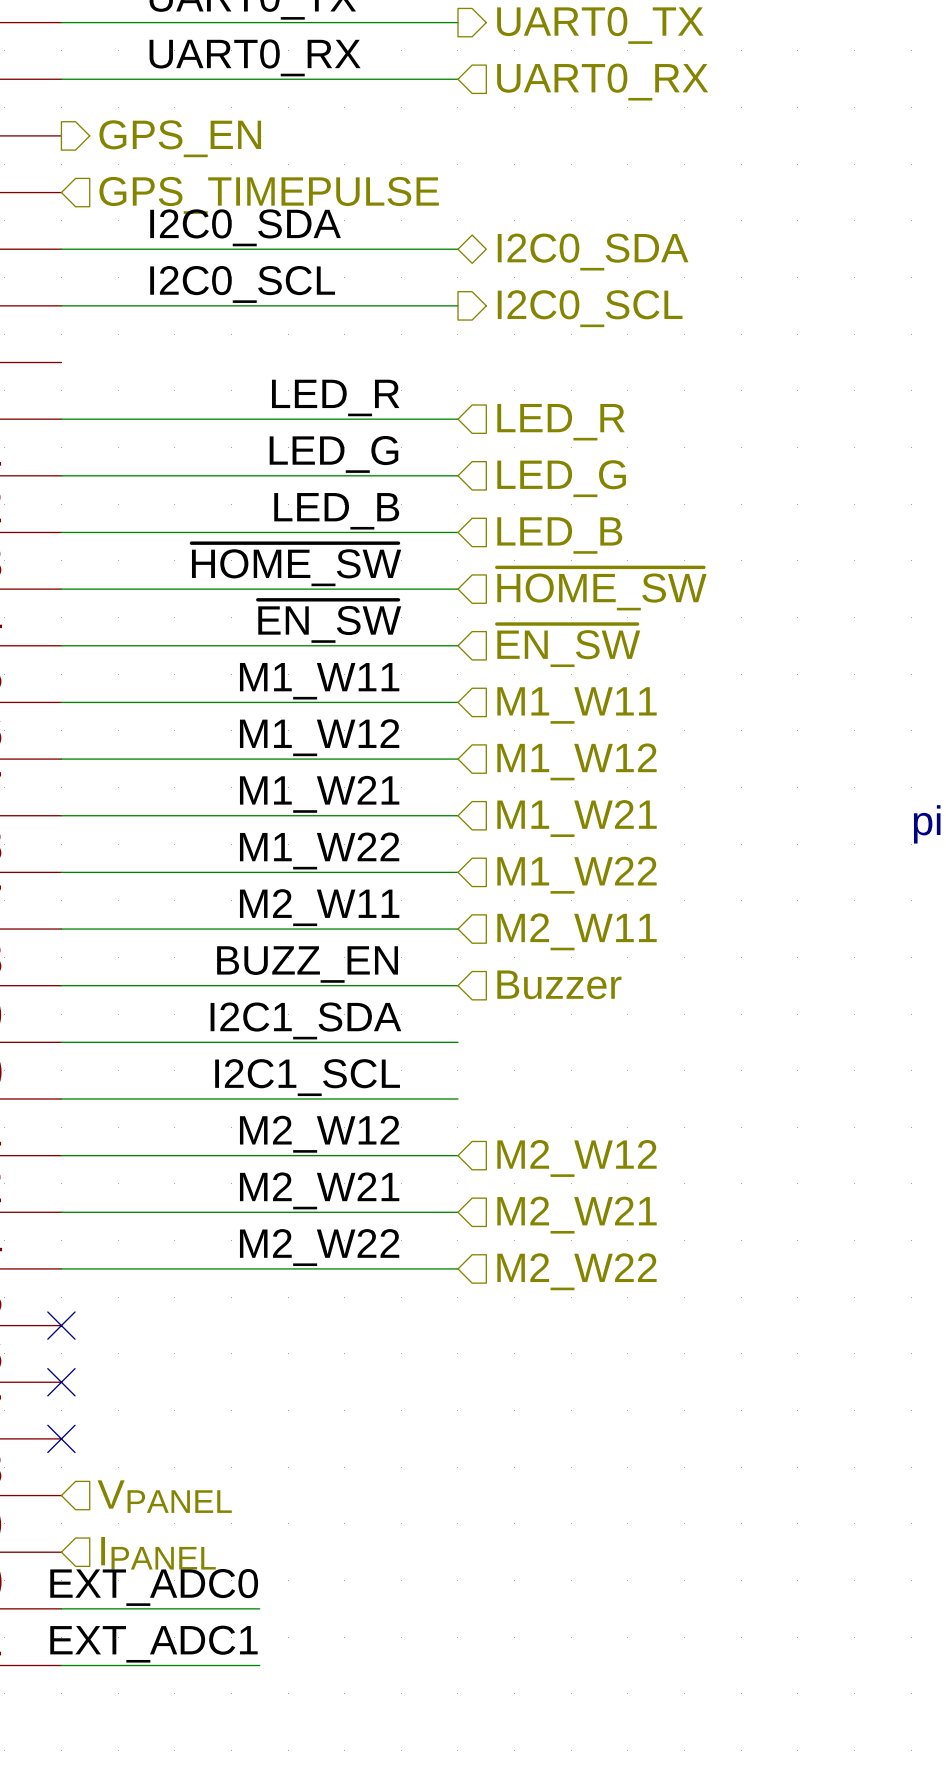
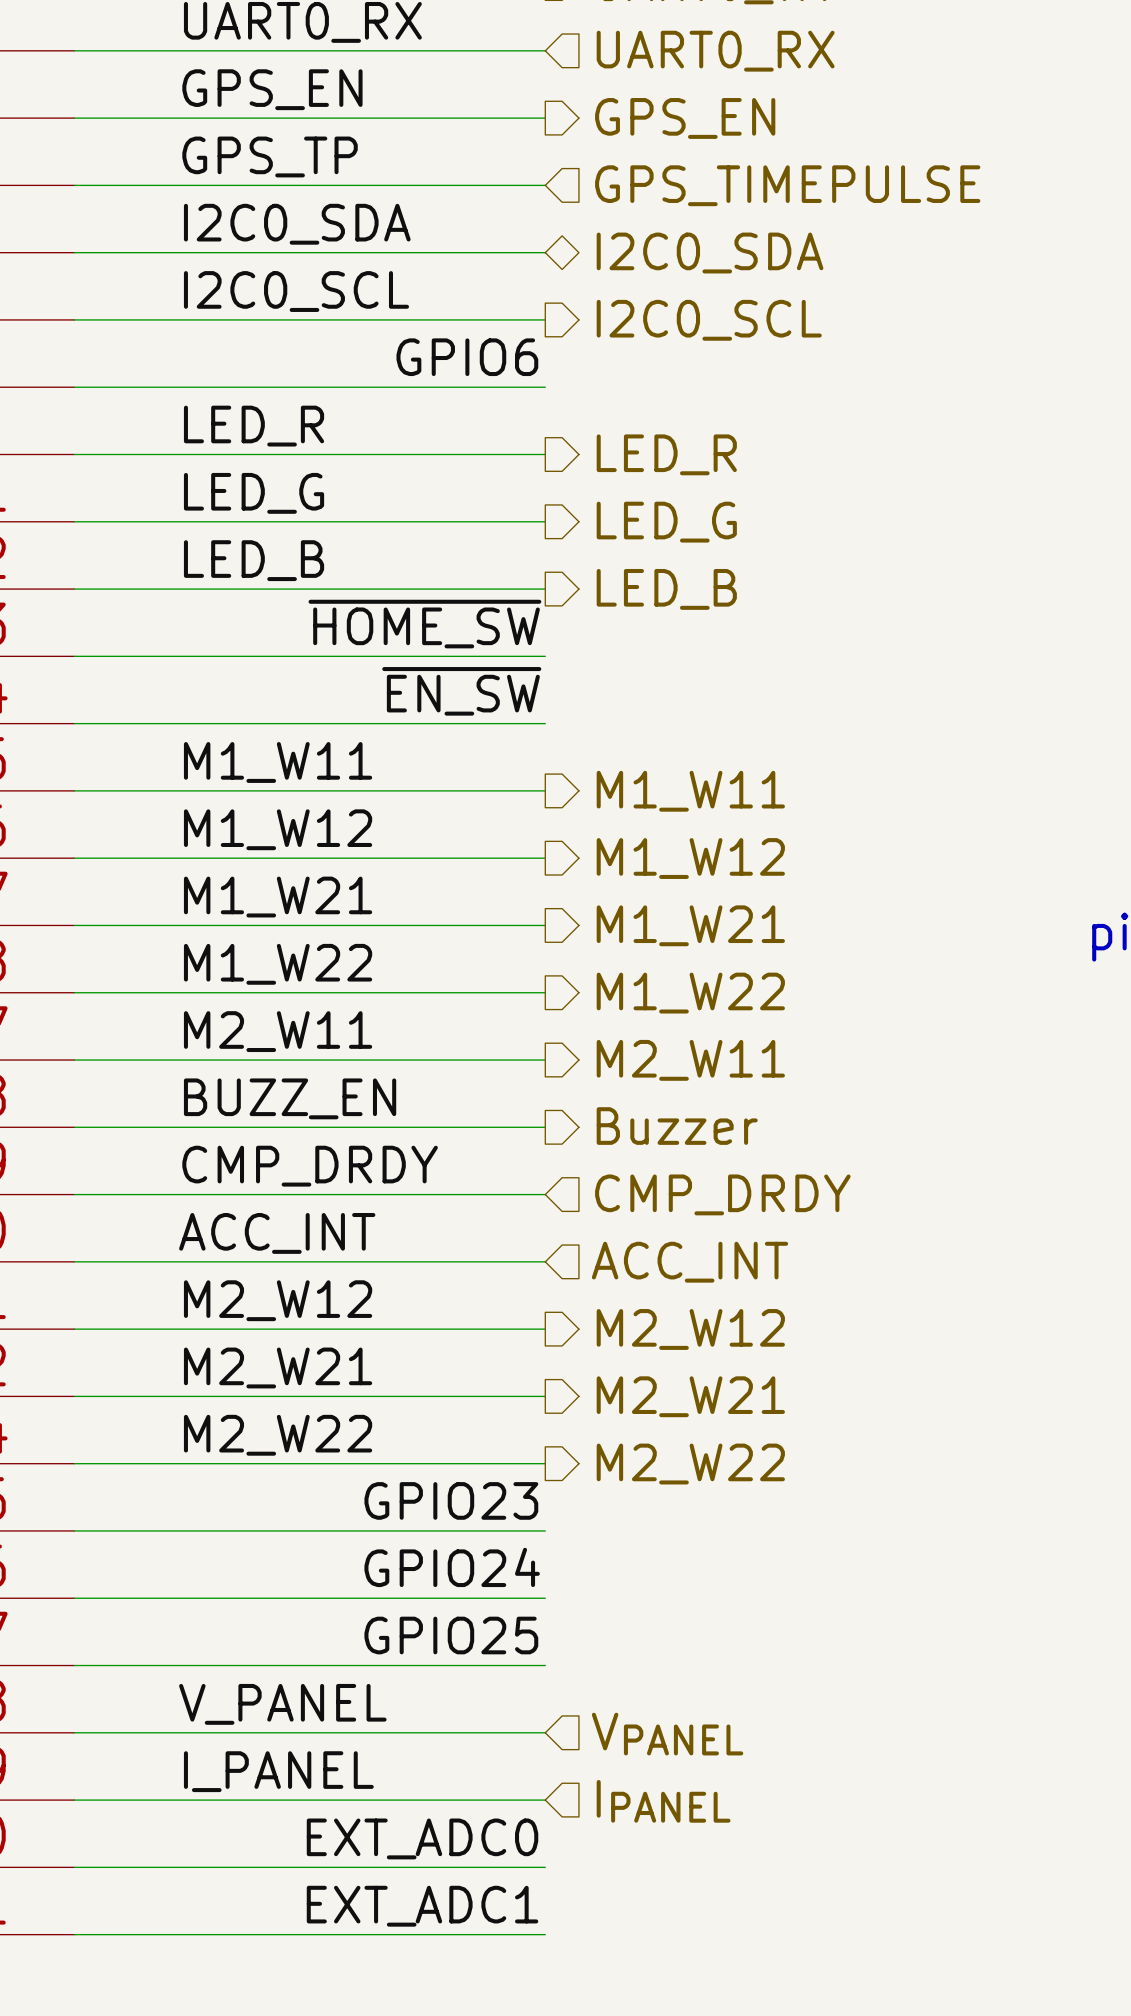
label: none -> GPS_EN (272, 89)
wire: none -> (74, 118) (545, 118)
hierarchical label position: GPS_EN (180, 138) -> GPS_EN (685, 118)
label: none -> GPS_TP (270, 156)
wire: none -> (74, 185) (545, 185)
hierarchical label position: GPS_TIMEPULSE (269, 195) -> GPS_TIMEPULSE (787, 185)
label: none -> GPIO6 (467, 357)
wire: none -> (74, 387) (545, 387)
label position: LED_R (335, 397) -> LED_R (254, 426)
hierarchical label shape: input (561, 422) -> output (666, 454)
label position: LED_G (333, 454) -> LED_G (254, 493)
hierarchical label shape: input (561, 478) -> output (666, 522)
label position: LED_B (336, 511) -> LED_B (254, 560)
hierarchical label shape: input (559, 535) -> output (666, 589)
label position: ~{HOME_SW} (296, 564) -> ~{HOME_SW} (424, 624)
hierarchical label: ~{HOME_SW} (601, 588) -> none
label position: ~{EN_SW} (329, 621) -> ~{EN_SW} (461, 691)
hierarchical label: ~{EN_SW} (568, 645) -> none
label position: M1_W11 (319, 681) -> M1_W11 (278, 762)
hierarchical label shape: input (577, 705) -> output (690, 791)
label position: M1_W12 (319, 737) -> M1_W12 (278, 829)
hierarchical label shape: input (576, 761) -> output (690, 858)
label position: M1_W21 (319, 794) -> M1_W21 (278, 897)
hierarchical label shape: input (577, 818) -> output (690, 925)
label position: M1_W22 (319, 850) -> M1_W22 (278, 964)
hierarchical label shape: input (576, 875) -> output (690, 993)
label position: M2_W11 (319, 907) -> M2_W11 (278, 1031)
hierarchical label shape: input (577, 931) -> output (690, 1060)
label position: BUZZ_EN (307, 964) -> BUZZ_EN (290, 1098)
hierarchical label shape: input (559, 984) -> output (677, 1126)
label: none -> CMP_DRDY (310, 1166)
label: I2C1_SDA (305, 1020) -> none
hierarchical label: none -> CMP_DRDY (722, 1194)
label: none -> ACC_INT (277, 1233)
label: I2C1_SCL (307, 1077) -> none
hierarchical label: none -> ACC_INT (690, 1262)
label position: M2_W12 (319, 1134) -> M2_W12 (278, 1300)
hierarchical label shape: input (576, 1158) -> output (690, 1329)
label position: M2_W21 (319, 1190) -> M2_W21 (278, 1367)
hierarchical label shape: input (577, 1215) -> output (690, 1396)
label position: M2_W22 (319, 1247) -> M2_W22 (278, 1435)
hierarchical label shape: input (576, 1271) -> output (690, 1464)
label: none -> GPIO23 (451, 1500)
wire: none -> (74, 1530) (545, 1530)
no-connect mark: (61, 1325) -> none
label: none -> GPIO24 (452, 1567)
wire: none -> (74, 1598) (545, 1598)
no-connect mark: (61, 1382) -> none
label: none -> GPIO25 (451, 1635)
wire: none -> (74, 1665) (545, 1665)
no-connect mark: (61, 1438) -> none
label: none -> V_PANEL (282, 1704)
wire: none -> (74, 1732) (545, 1732)
hierarchical label position: VPANEL (164, 1496) -> VPANEL (667, 1734)
label: none -> I_PANEL (278, 1771)
wire: none -> (74, 1800) (545, 1800)
hierarchical label position: IPANEL (158, 1553) -> IPANEL (663, 1801)
label position: EXT_ADC0 (154, 1587) -> EXT_ADC0 (422, 1838)
wire: none -> (309, 1867) (545, 1867)
label position: EXT_ADC1 (153, 1644) -> EXT_ADC1 (422, 1906)
wire: none -> (309, 1934) (545, 1934)

